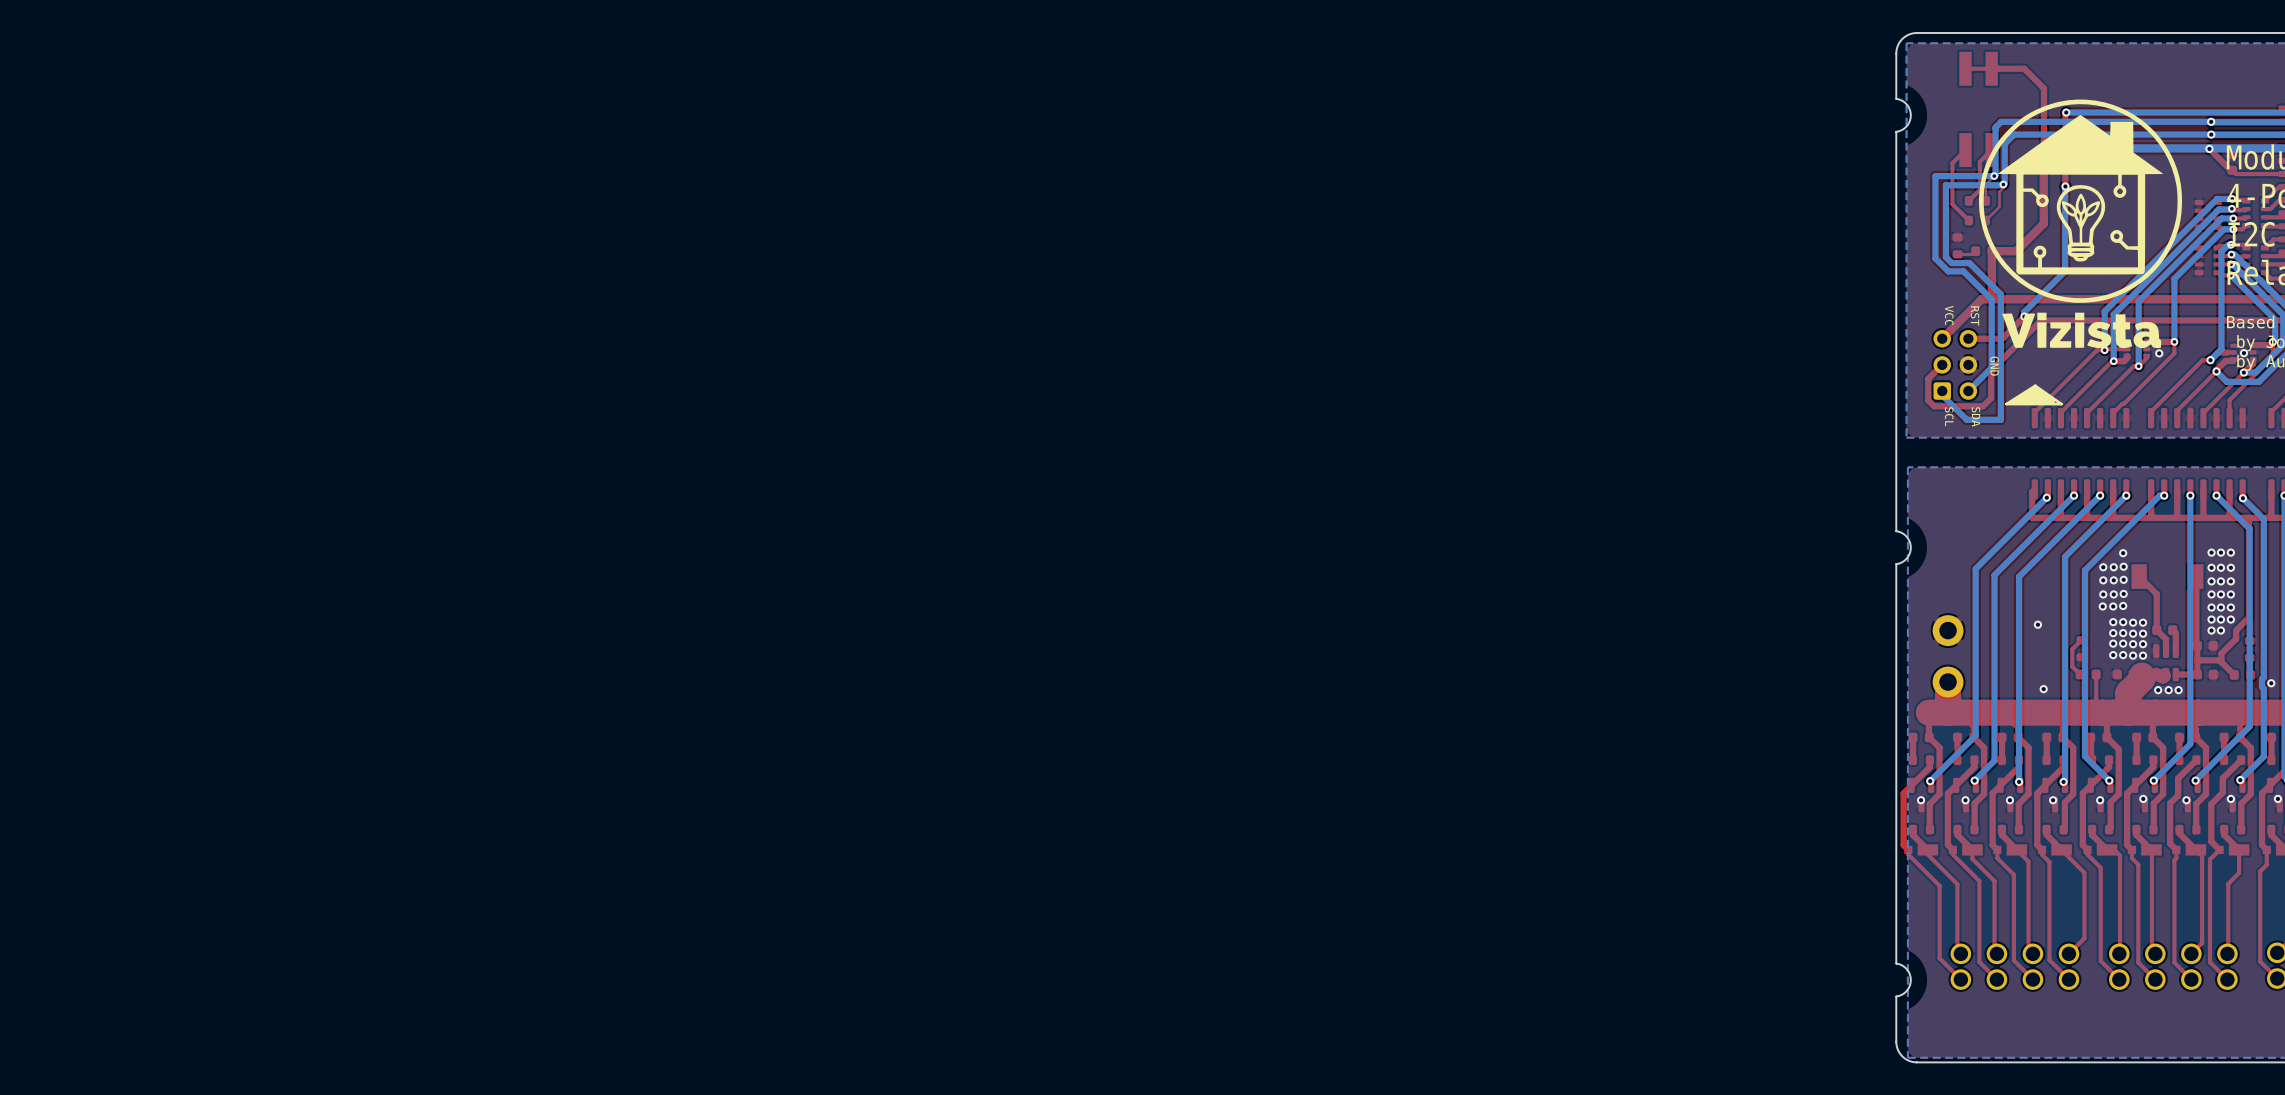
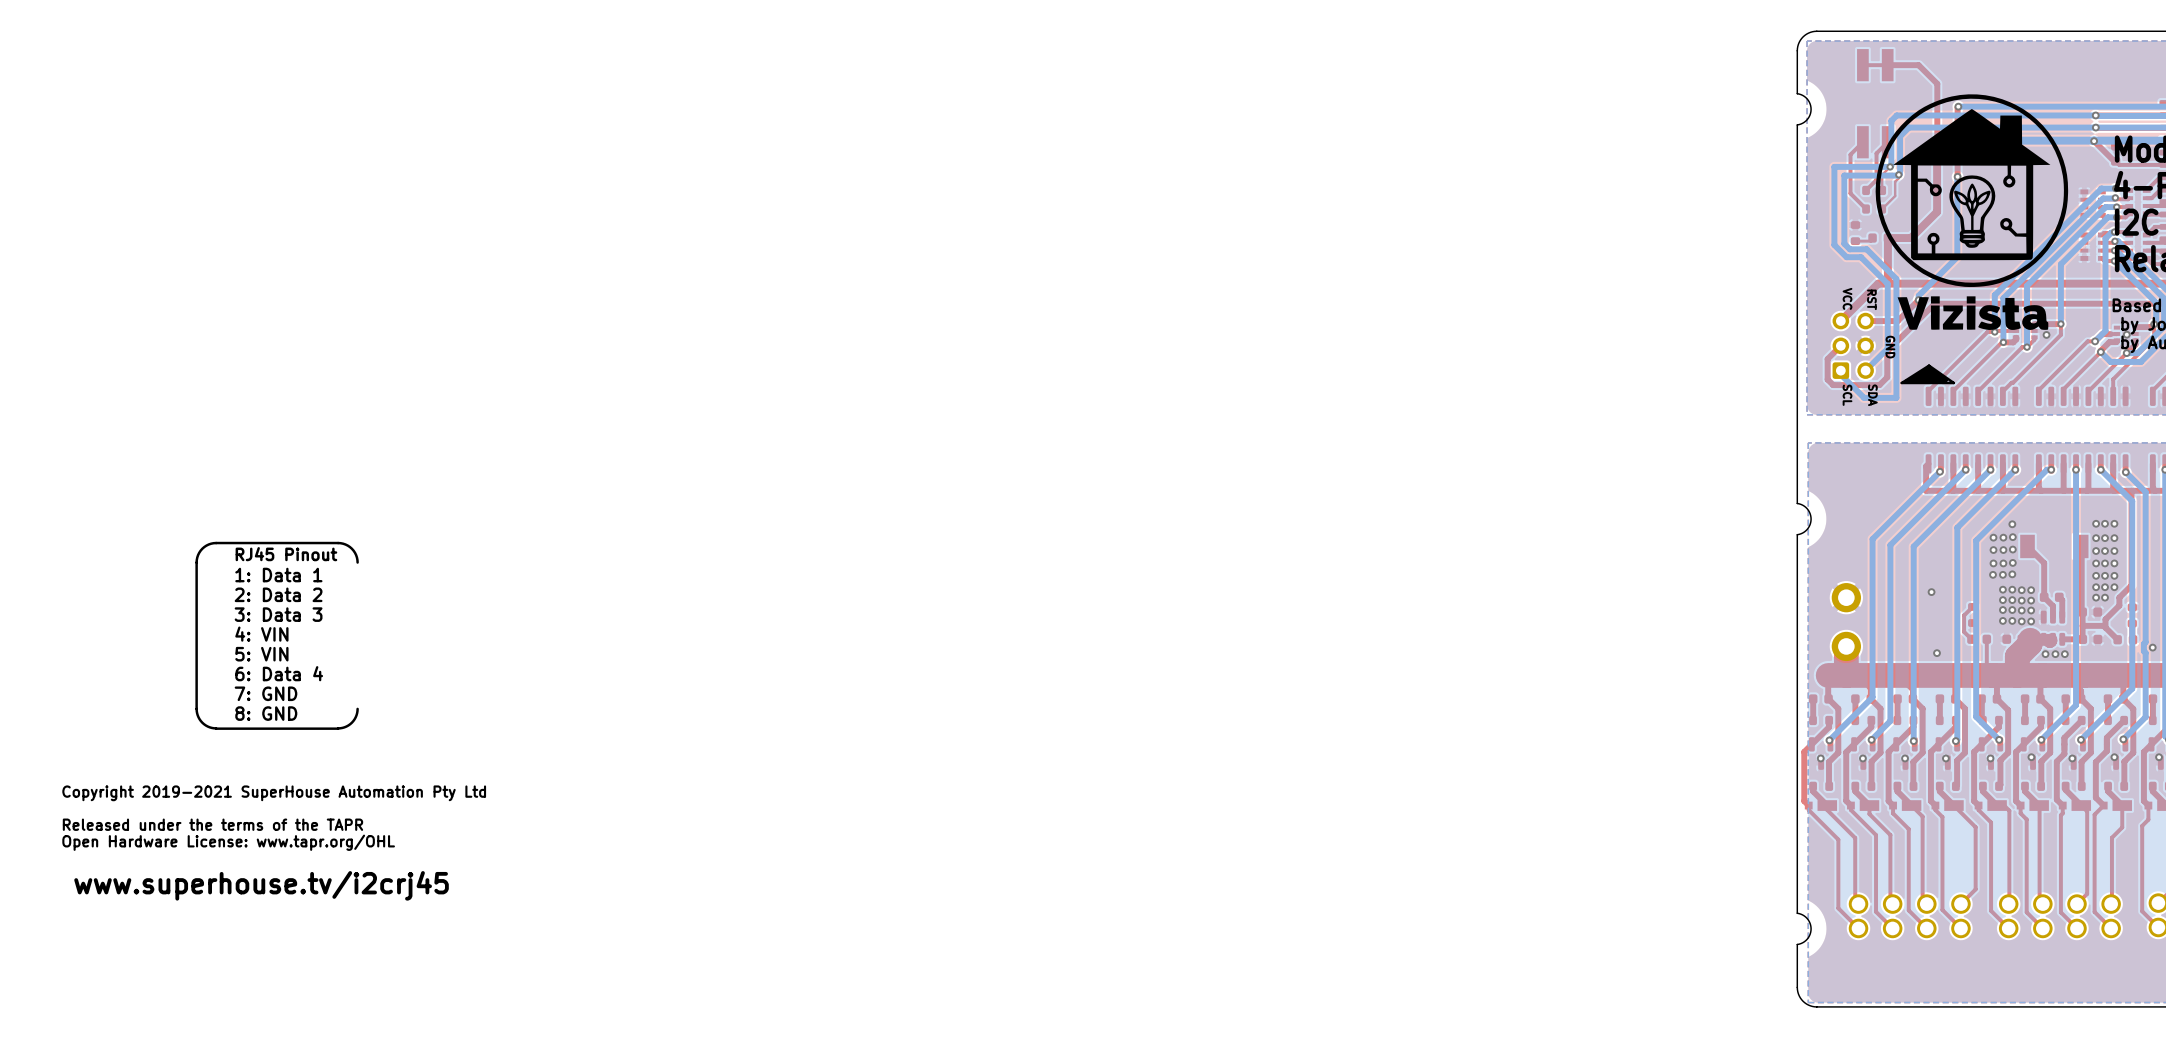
text: none -> RJ45 Pinout (286, 554)
line: none -> (357, 562) (351, 548) (340, 543) (216, 543) (208, 544) (200, 550) (196, 562) (196, 711) (202, 722) (216, 728)
text: none -> 1: Data 1 (278, 575)
text: none -> 2: Data 2 (278, 594)
text: none -> 3: Data 3 (278, 614)
text: none -> 4: VIN (261, 634)
text: none -> 5: VIN (261, 654)
text: none -> 6: Data 4 (279, 673)
text: none -> 7: GND (266, 693)
line: none -> (357, 708) (351, 722) (338, 728)
text: none -> 8: GND (266, 713)
line: none -> (338, 728) (216, 728)
text: none -> Copyright 2019-2021 SuperHouse Automation Pty Ltd (274, 793)
text: none -> Released under the terms of the TAPR (212, 824)
text: none -> Open Hardware License: www.tapr.org/OHL (228, 842)
text: none -> www.superhouse.tv/i2crj45 (261, 885)

